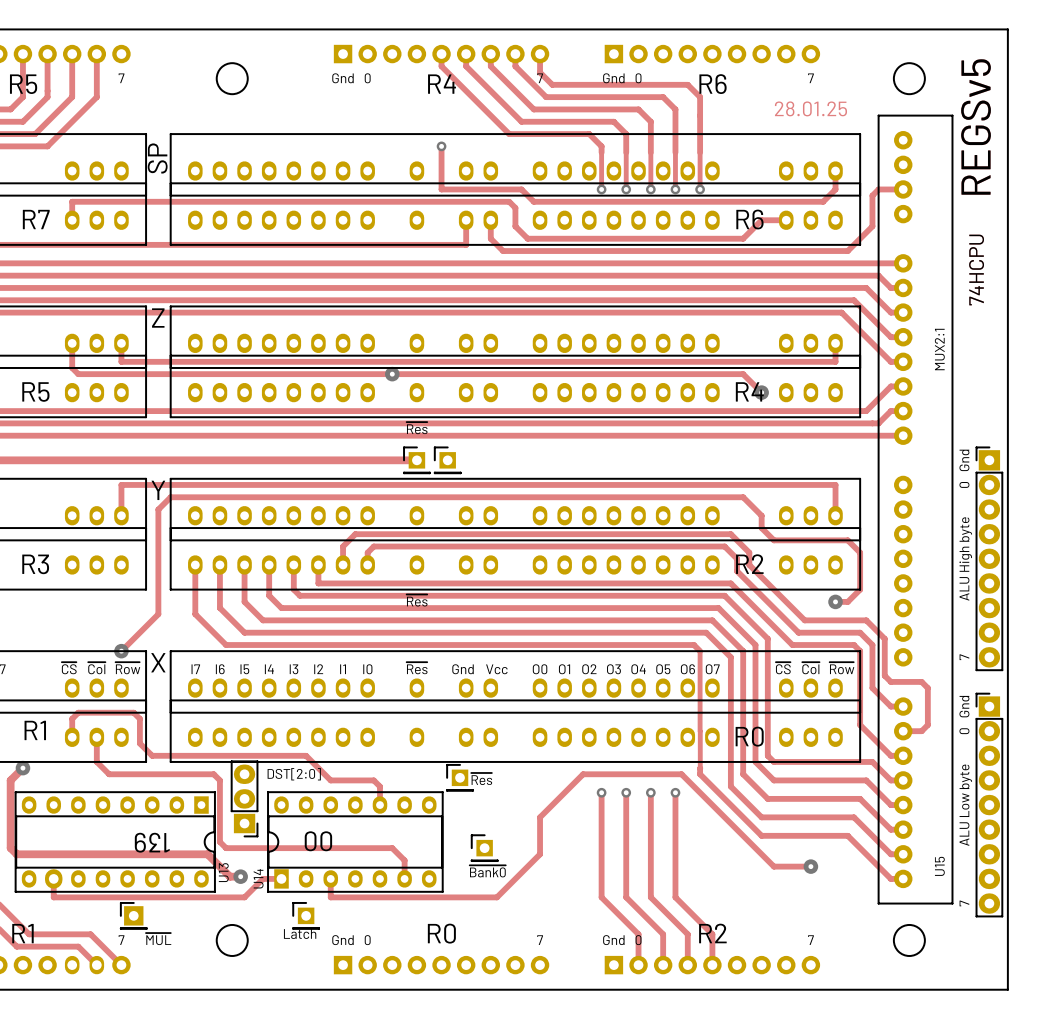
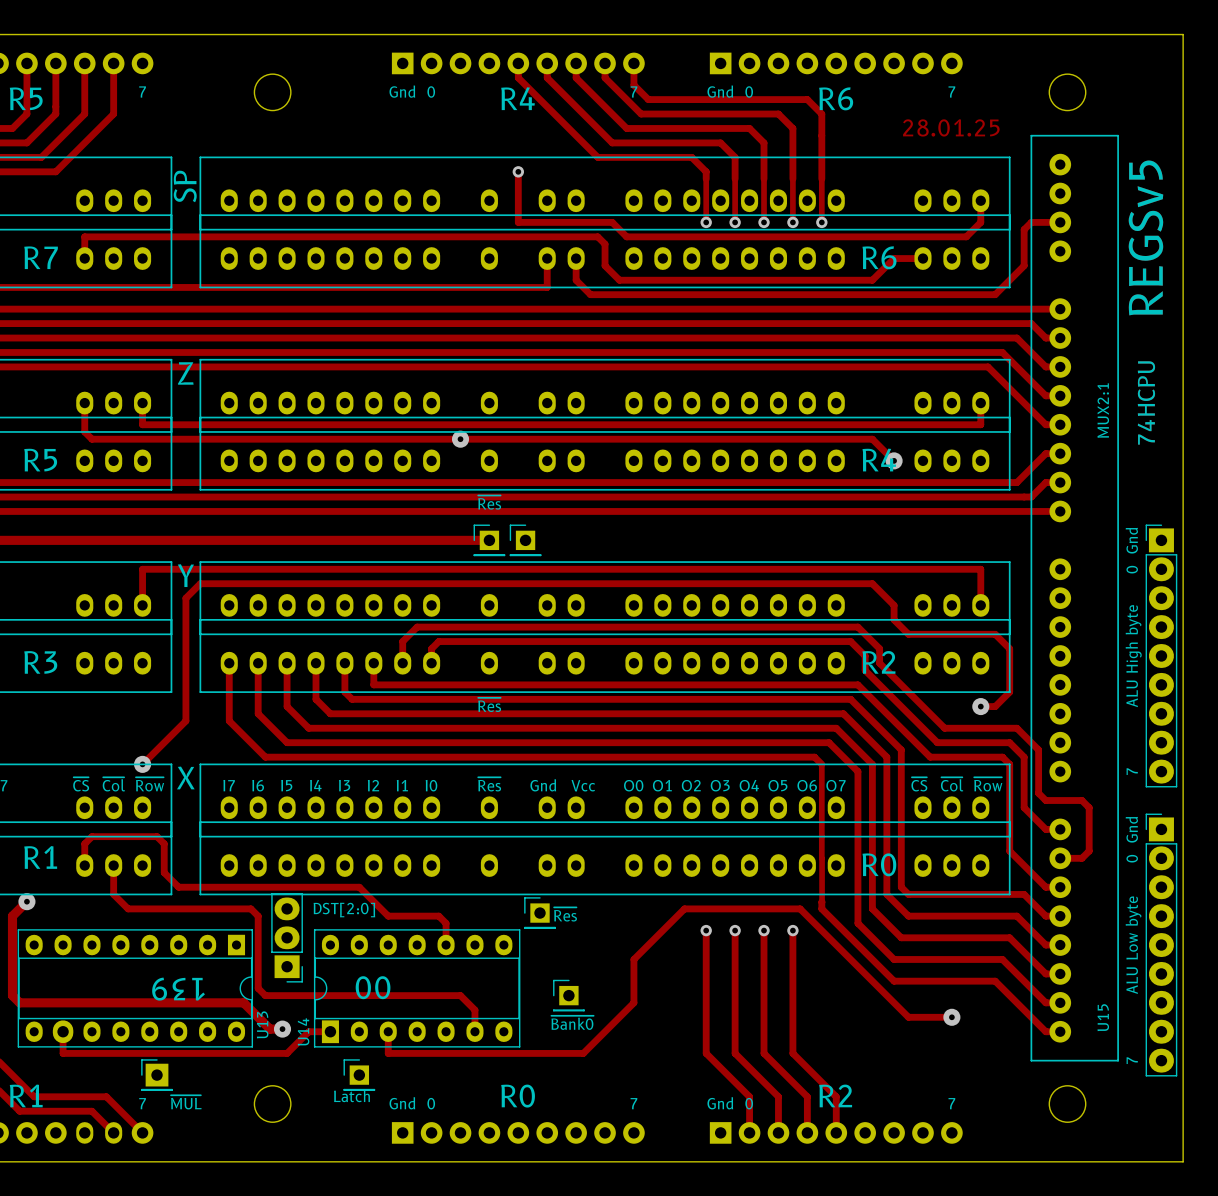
text: REGSv5 (976, 127) -> none
text: none -> REGSv5 (1145, 237)
text: 74HCPU (976, 270) -> none
text: none -> 74HCPU (1146, 402)

